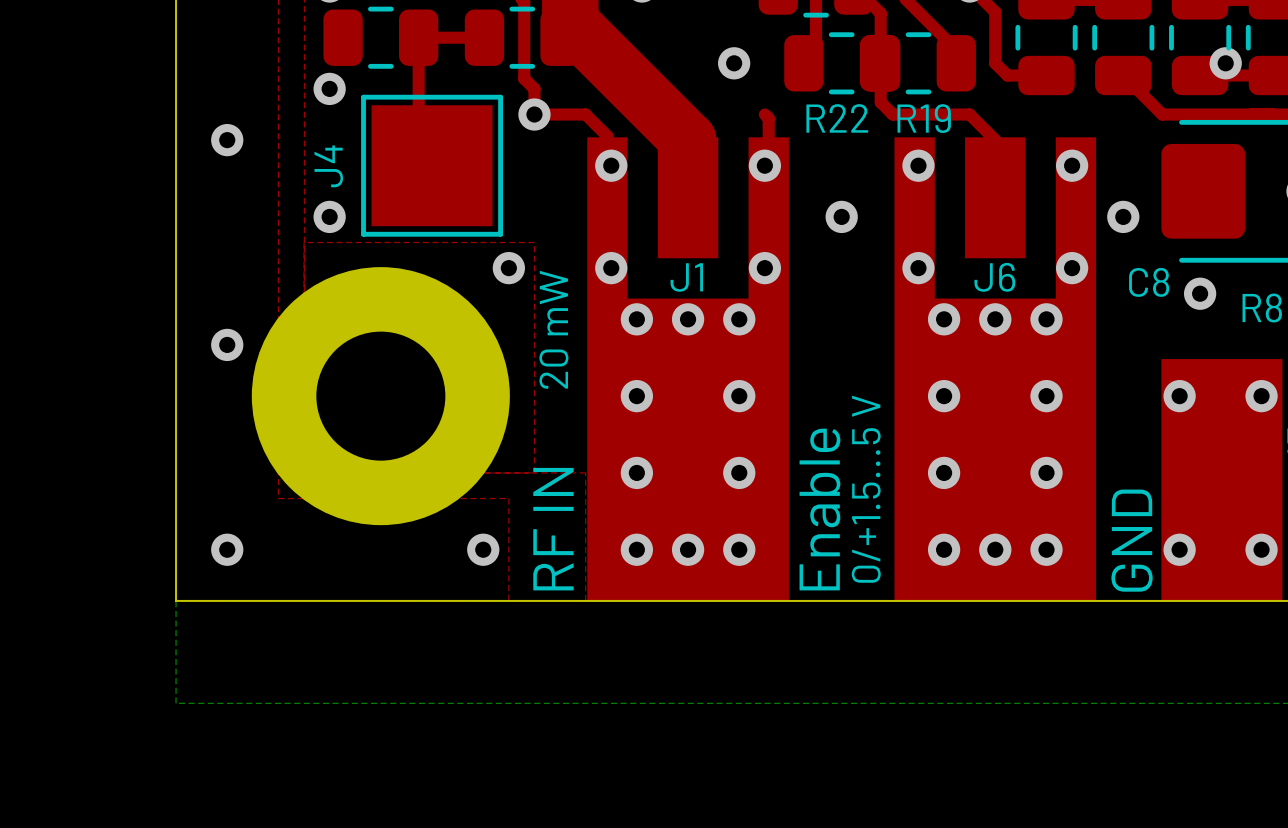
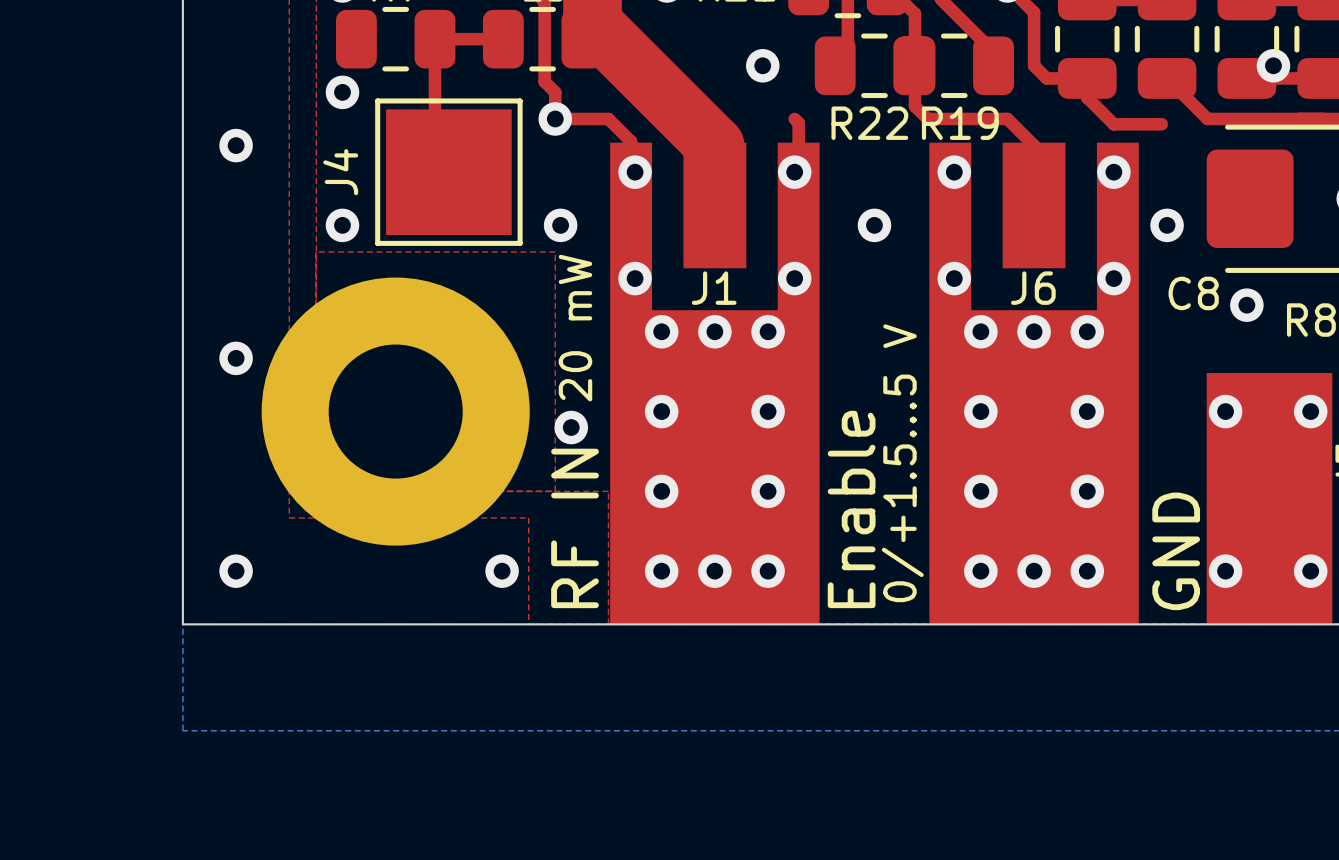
top track: none -> (1087, 78) (1087, 97) (1113, 124) (1161, 124)
via position: (508, 268) -> (560, 225)
via: none -> (571, 427)

